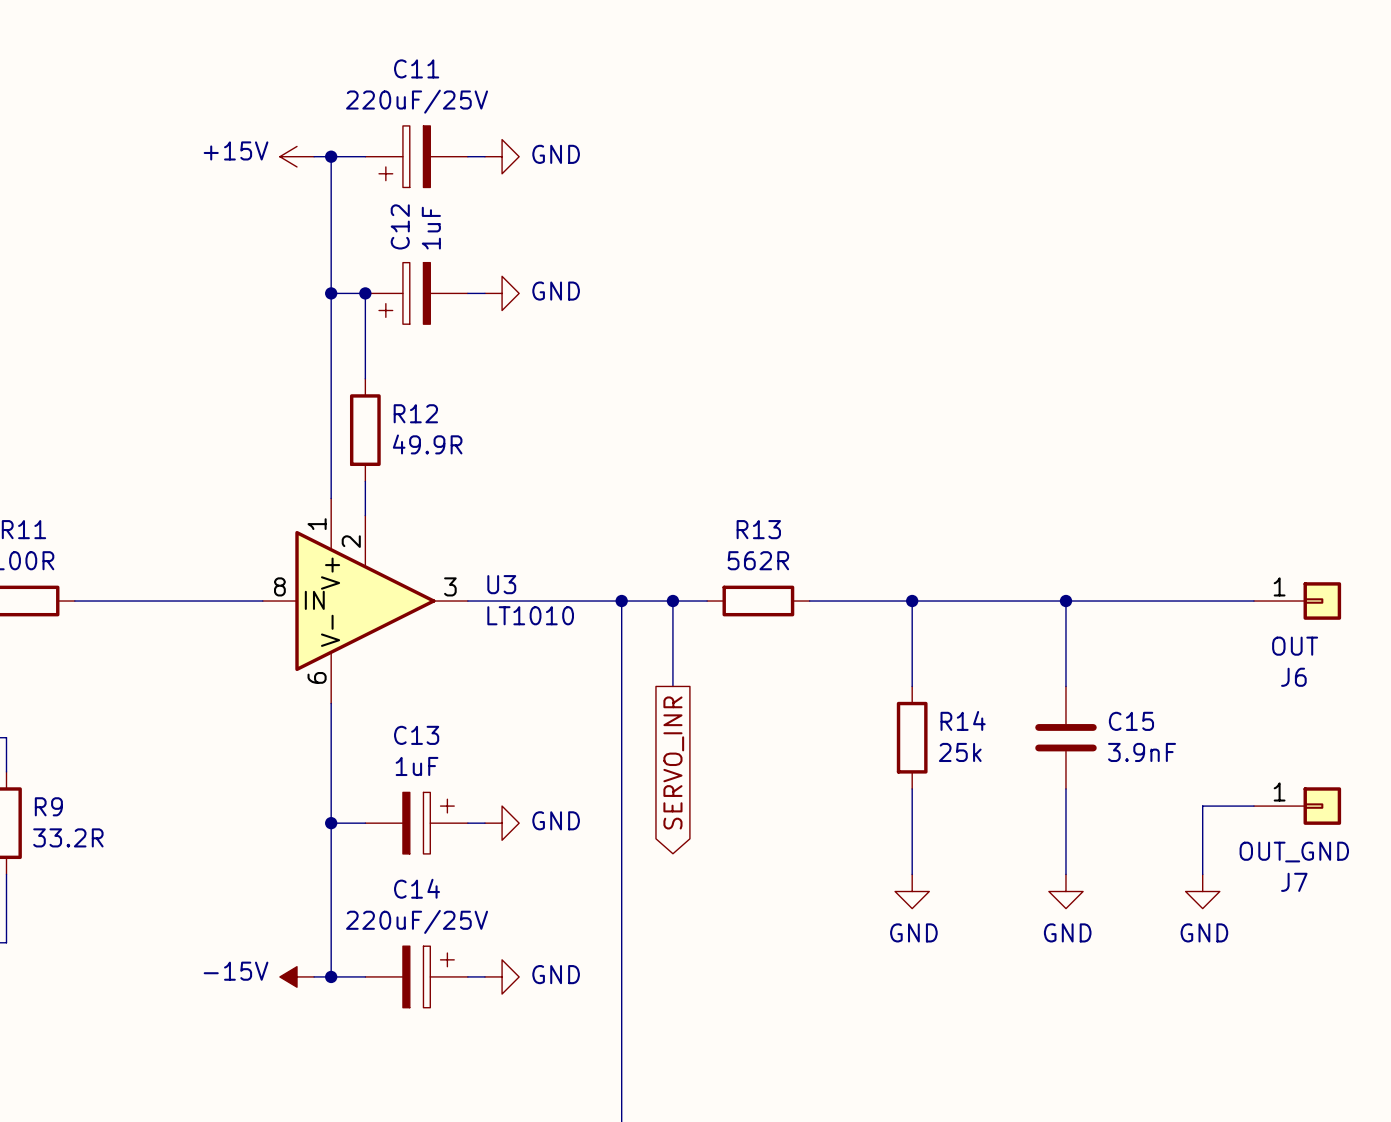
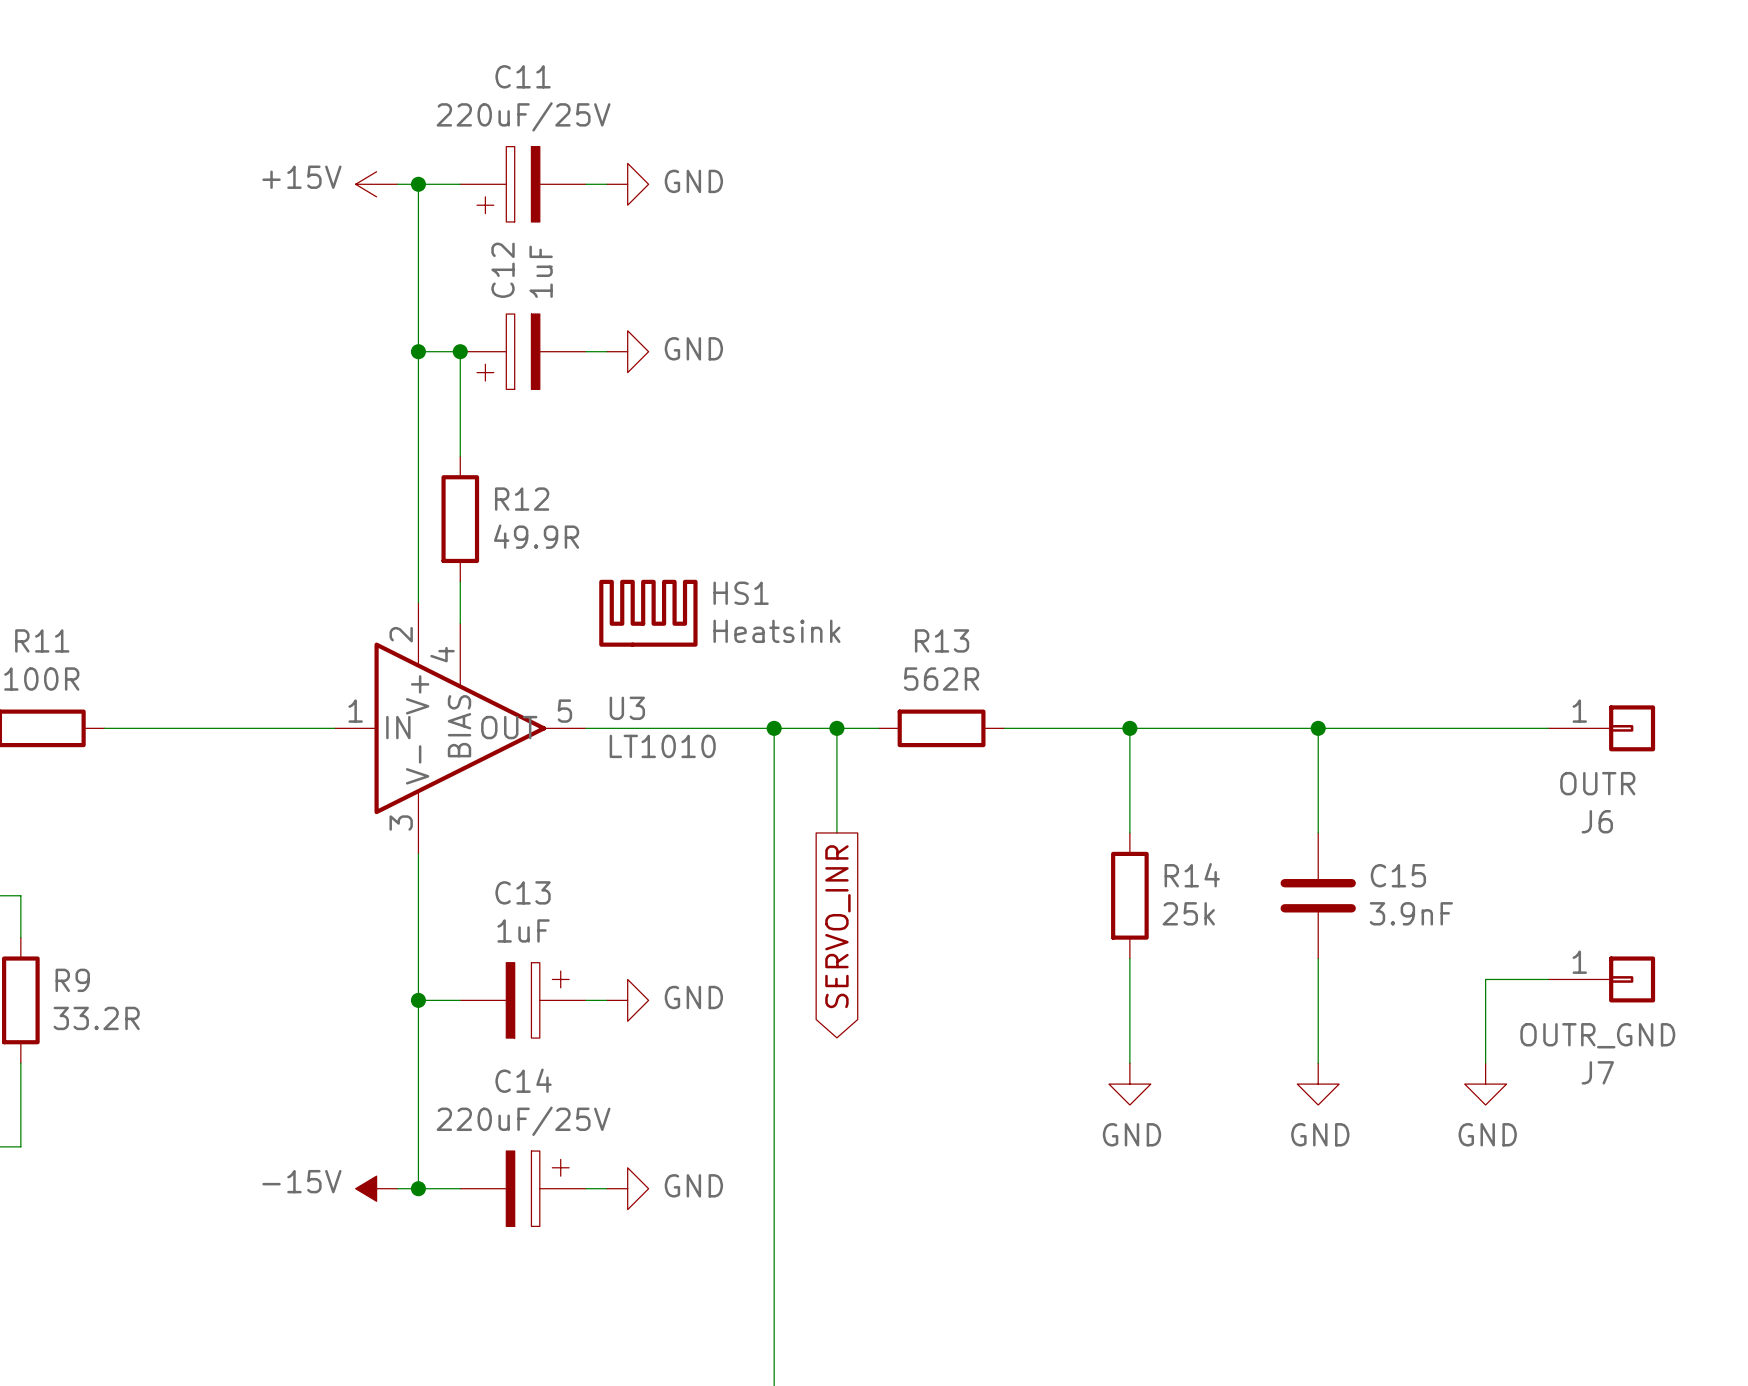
HS1: none -> Heatsink (648, 613)
U3 pin number: 1 (317, 524) -> 2 (401, 634)
U3 pin number: 2 (351, 541) -> 4 (442, 654)
U3 pin number: 8 (279, 586) -> 1 (355, 711)
U3 pin number: 3 (450, 586) -> 5 (564, 711)
U3 pin name: none -> BIAS (459, 726)
U3 pin name: none -> OUT (509, 727)
J6 value: OUT (1295, 646) -> OUTR (1597, 783)
U3 pin number: 6 (317, 677) -> 3 (401, 823)
J7 value: OUT_GND (1294, 852) -> OUTR_GND (1597, 1035)

